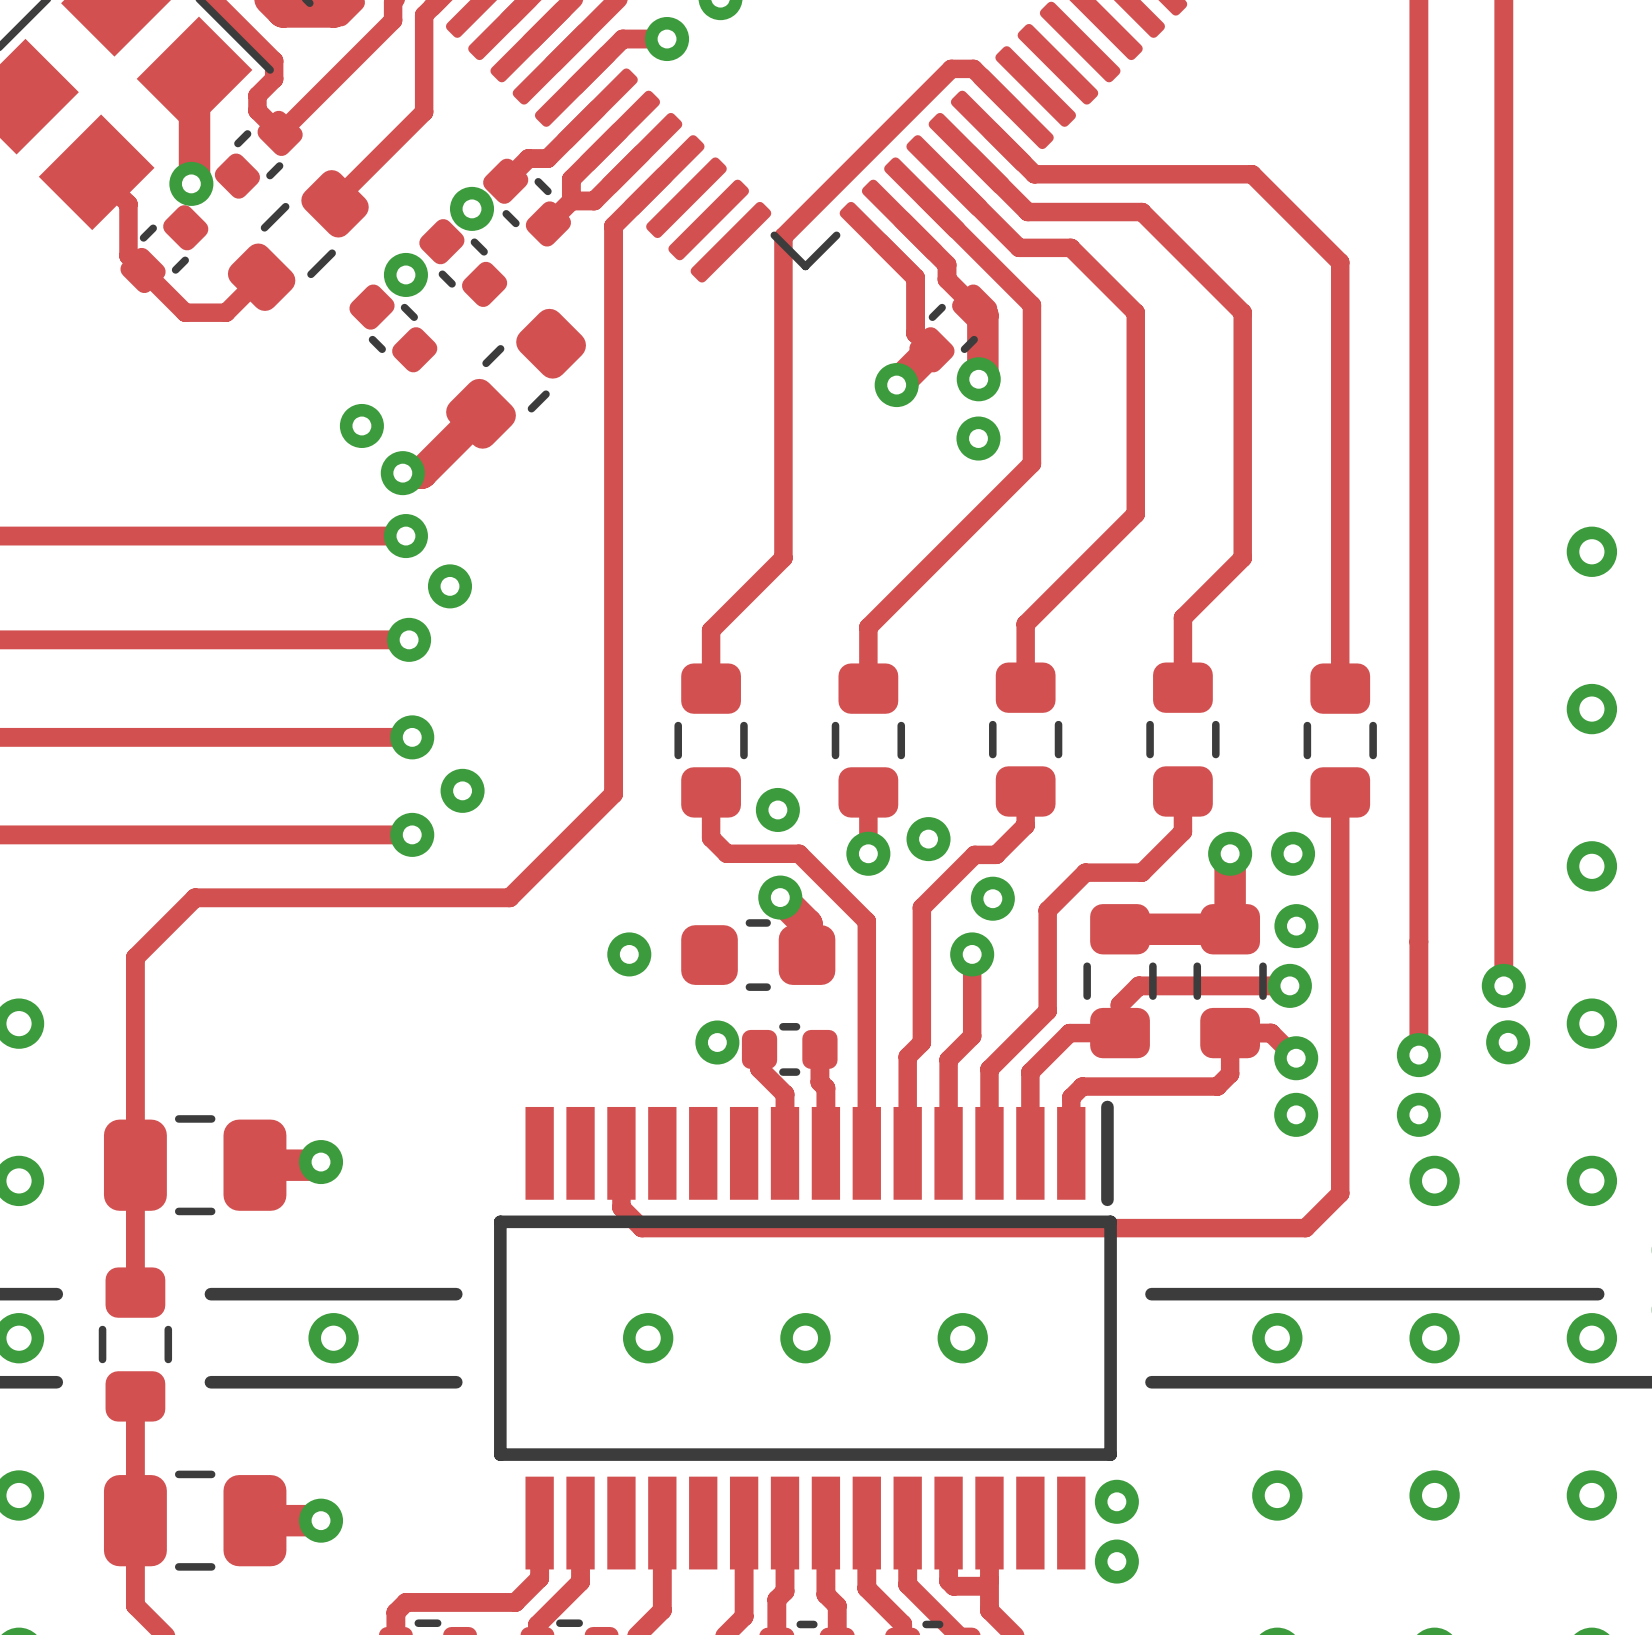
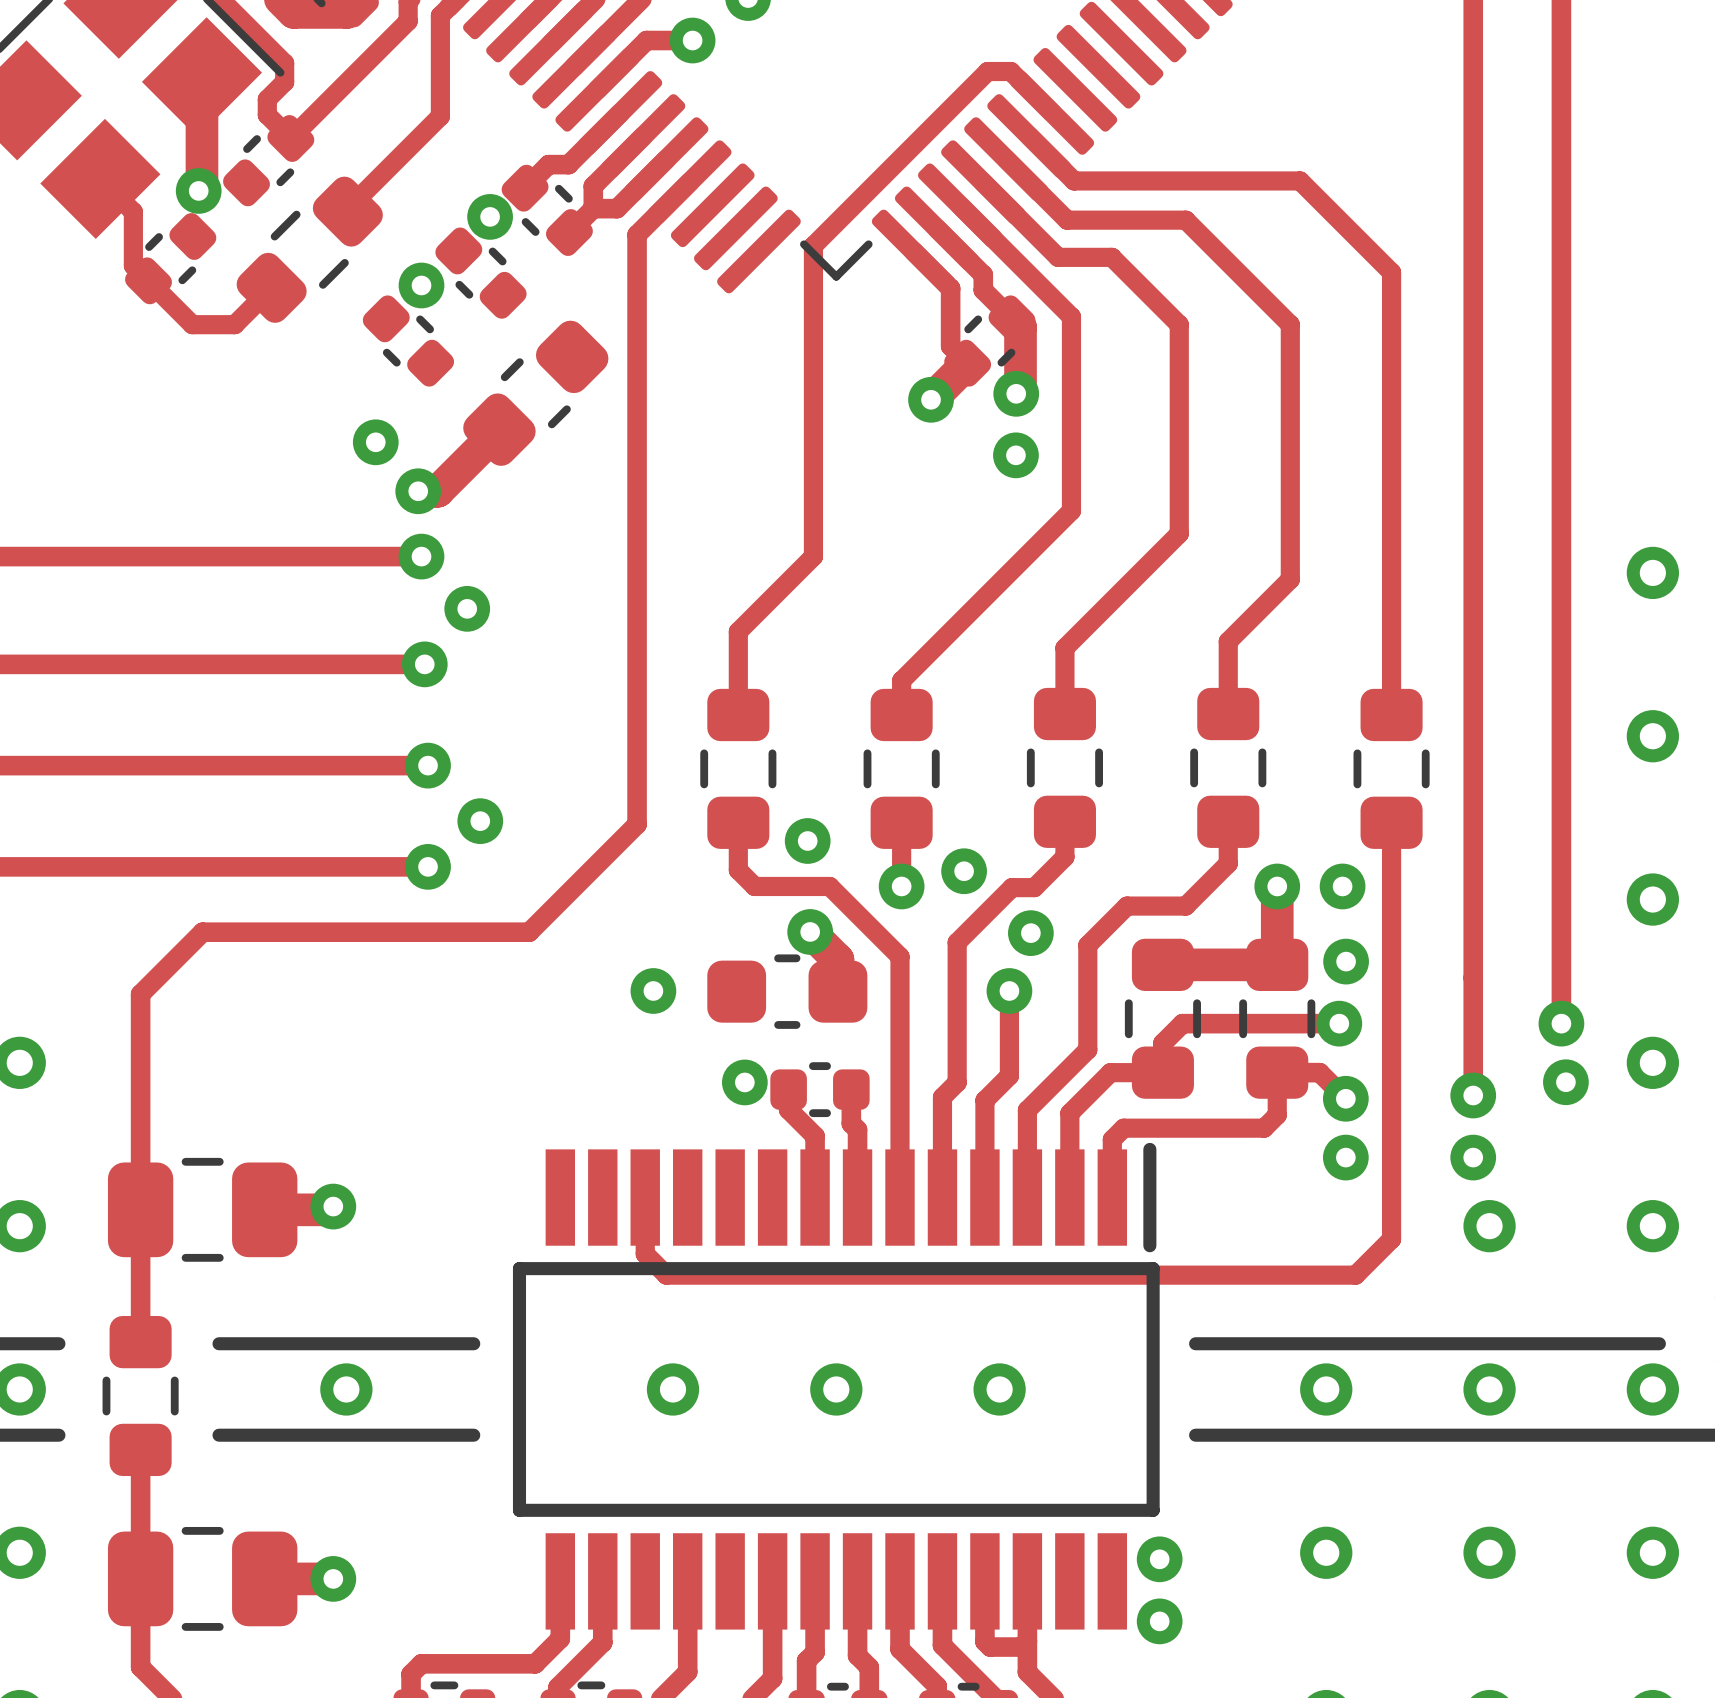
track: (1031, 463) (868, 627) (868, 655) -> (1071, 481) (1071, 510) (901, 680)
track: (783, 536) (783, 558) (711, 630) -> (813, 556) (738, 631) (738, 654)

